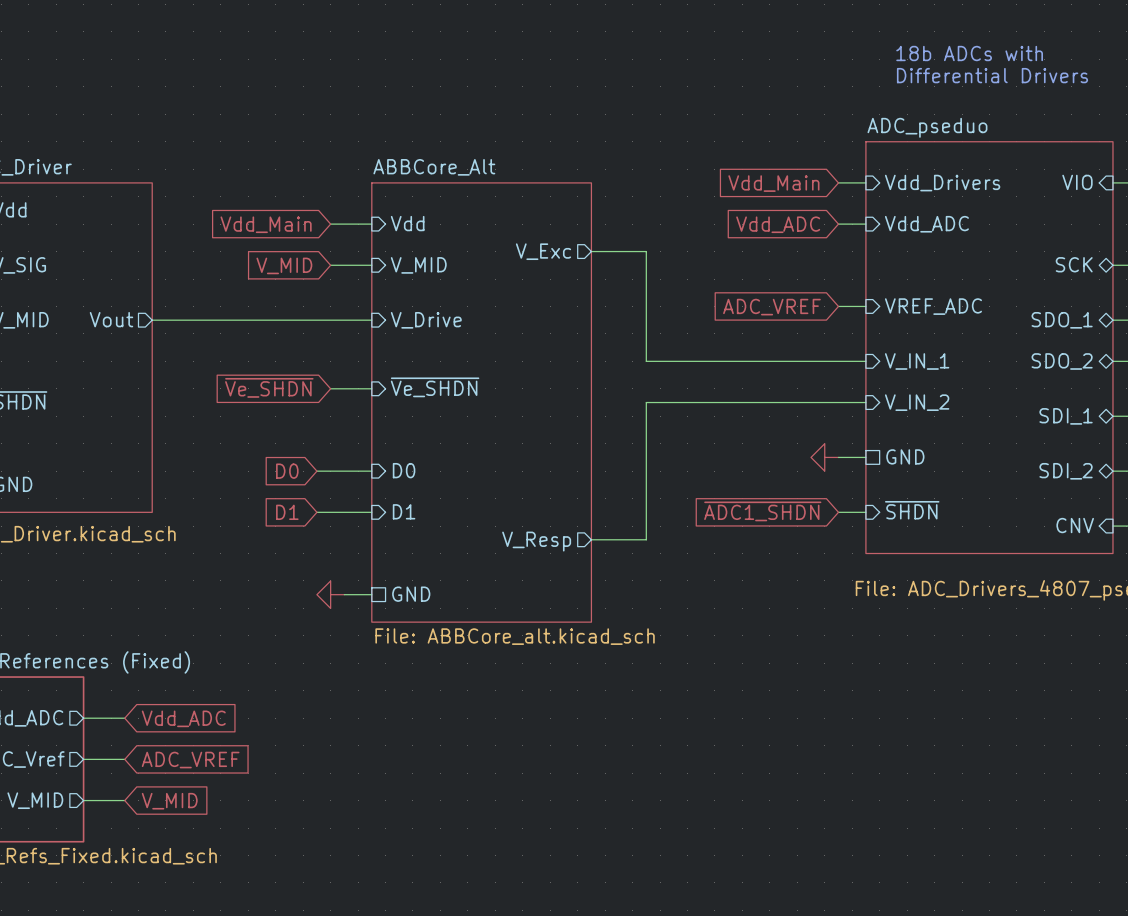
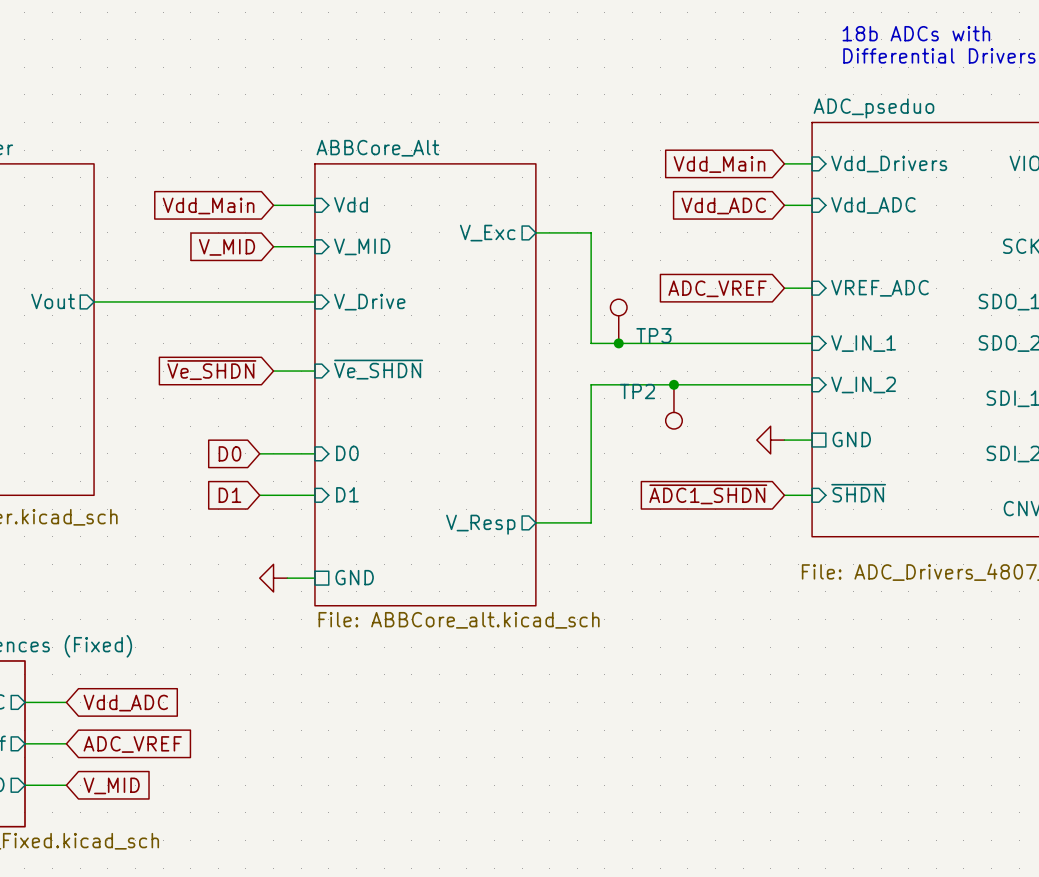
TP3: none -> (618, 321)
junction: none -> (618, 343)
junction: none -> (673, 384)
TP2: none -> (673, 406)

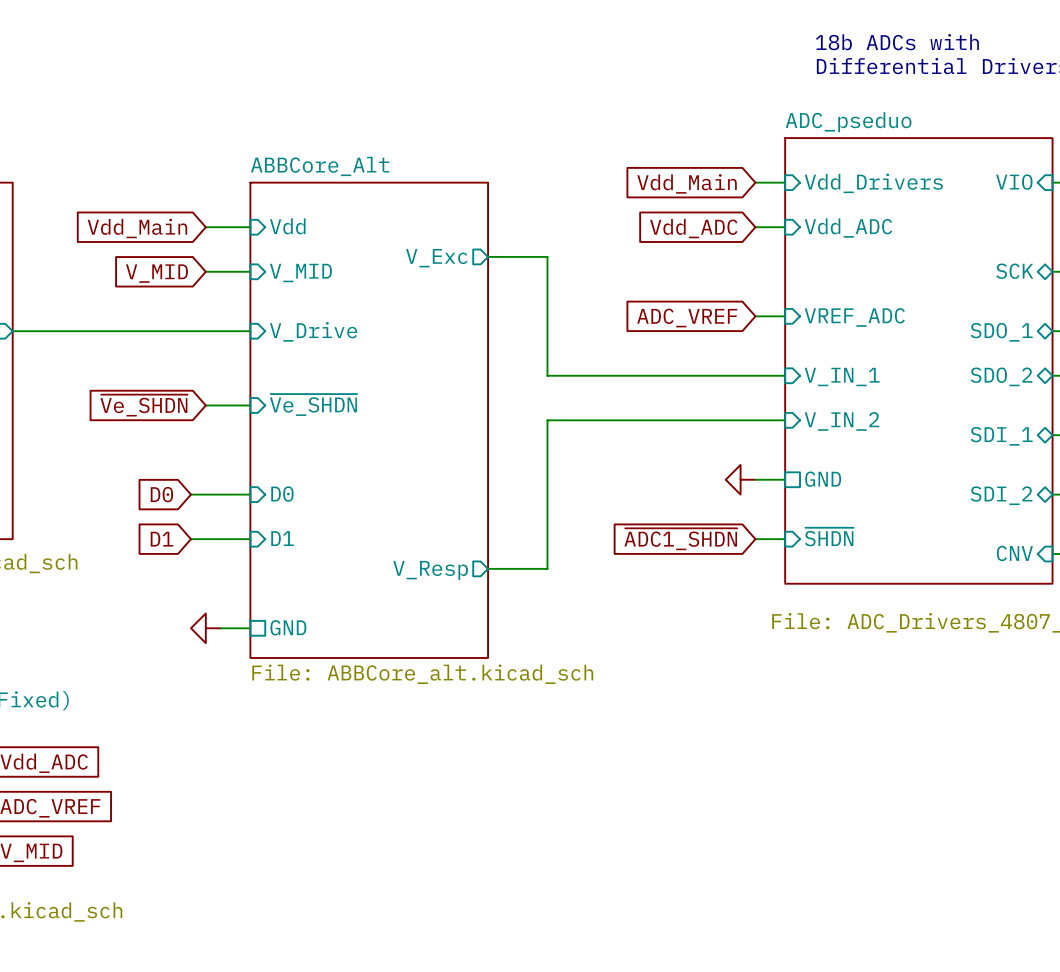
TP3: (618, 321) -> none
junction: (618, 343) -> none
junction: (673, 384) -> none
TP2: (673, 406) -> none

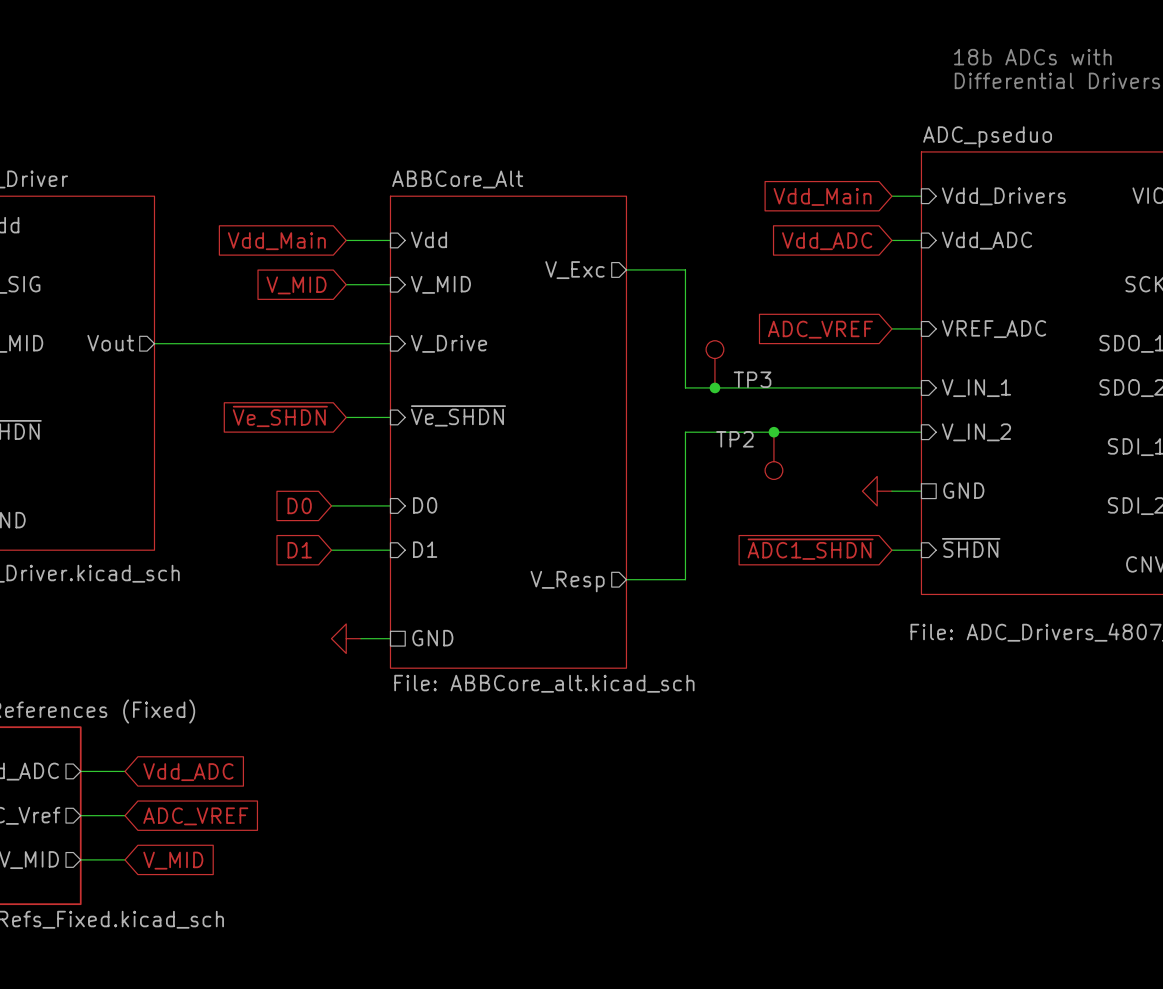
TP3: none -> (714, 364)
junction: none -> (714, 387)
junction: none -> (773, 432)
TP2: none -> (773, 455)

